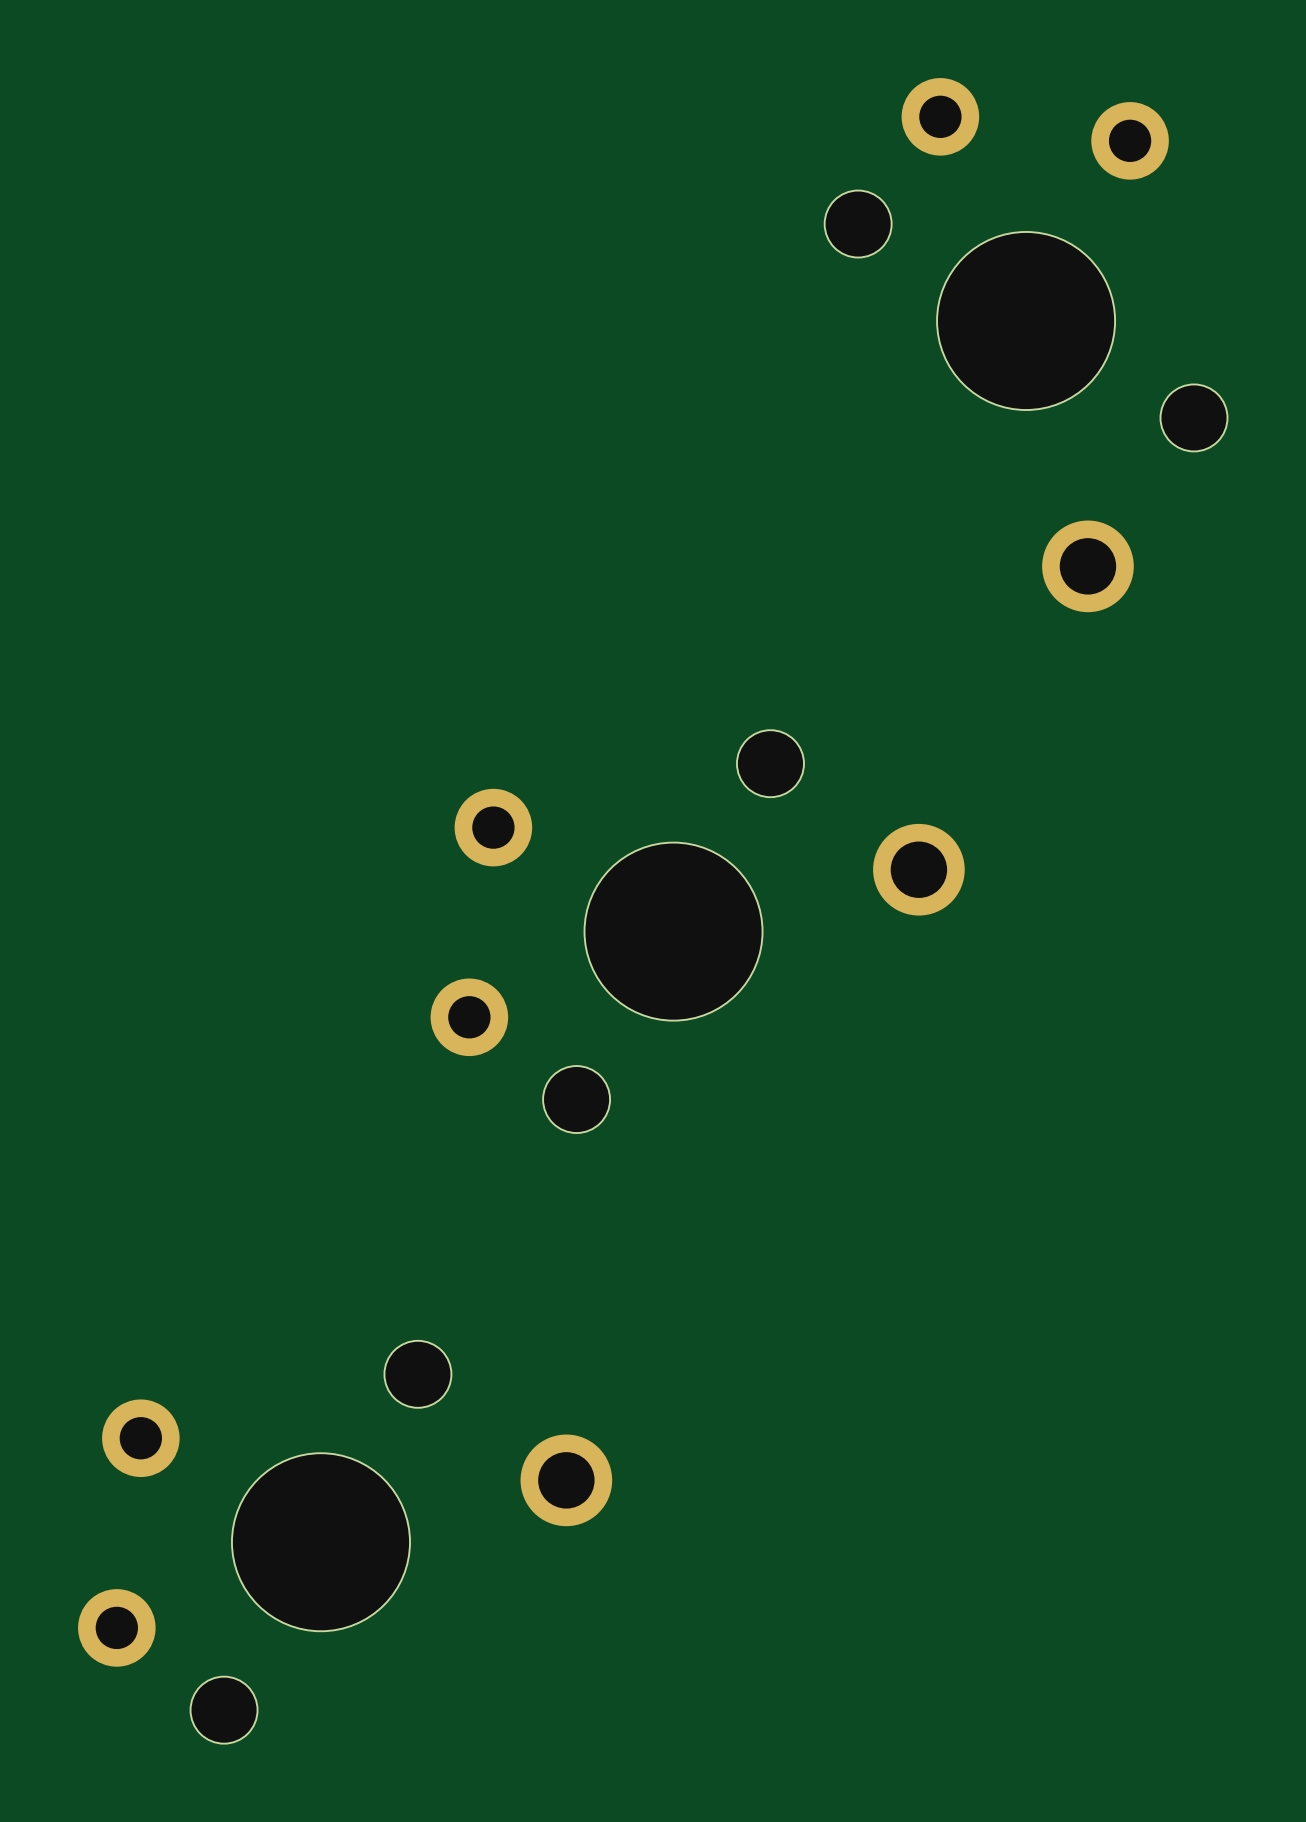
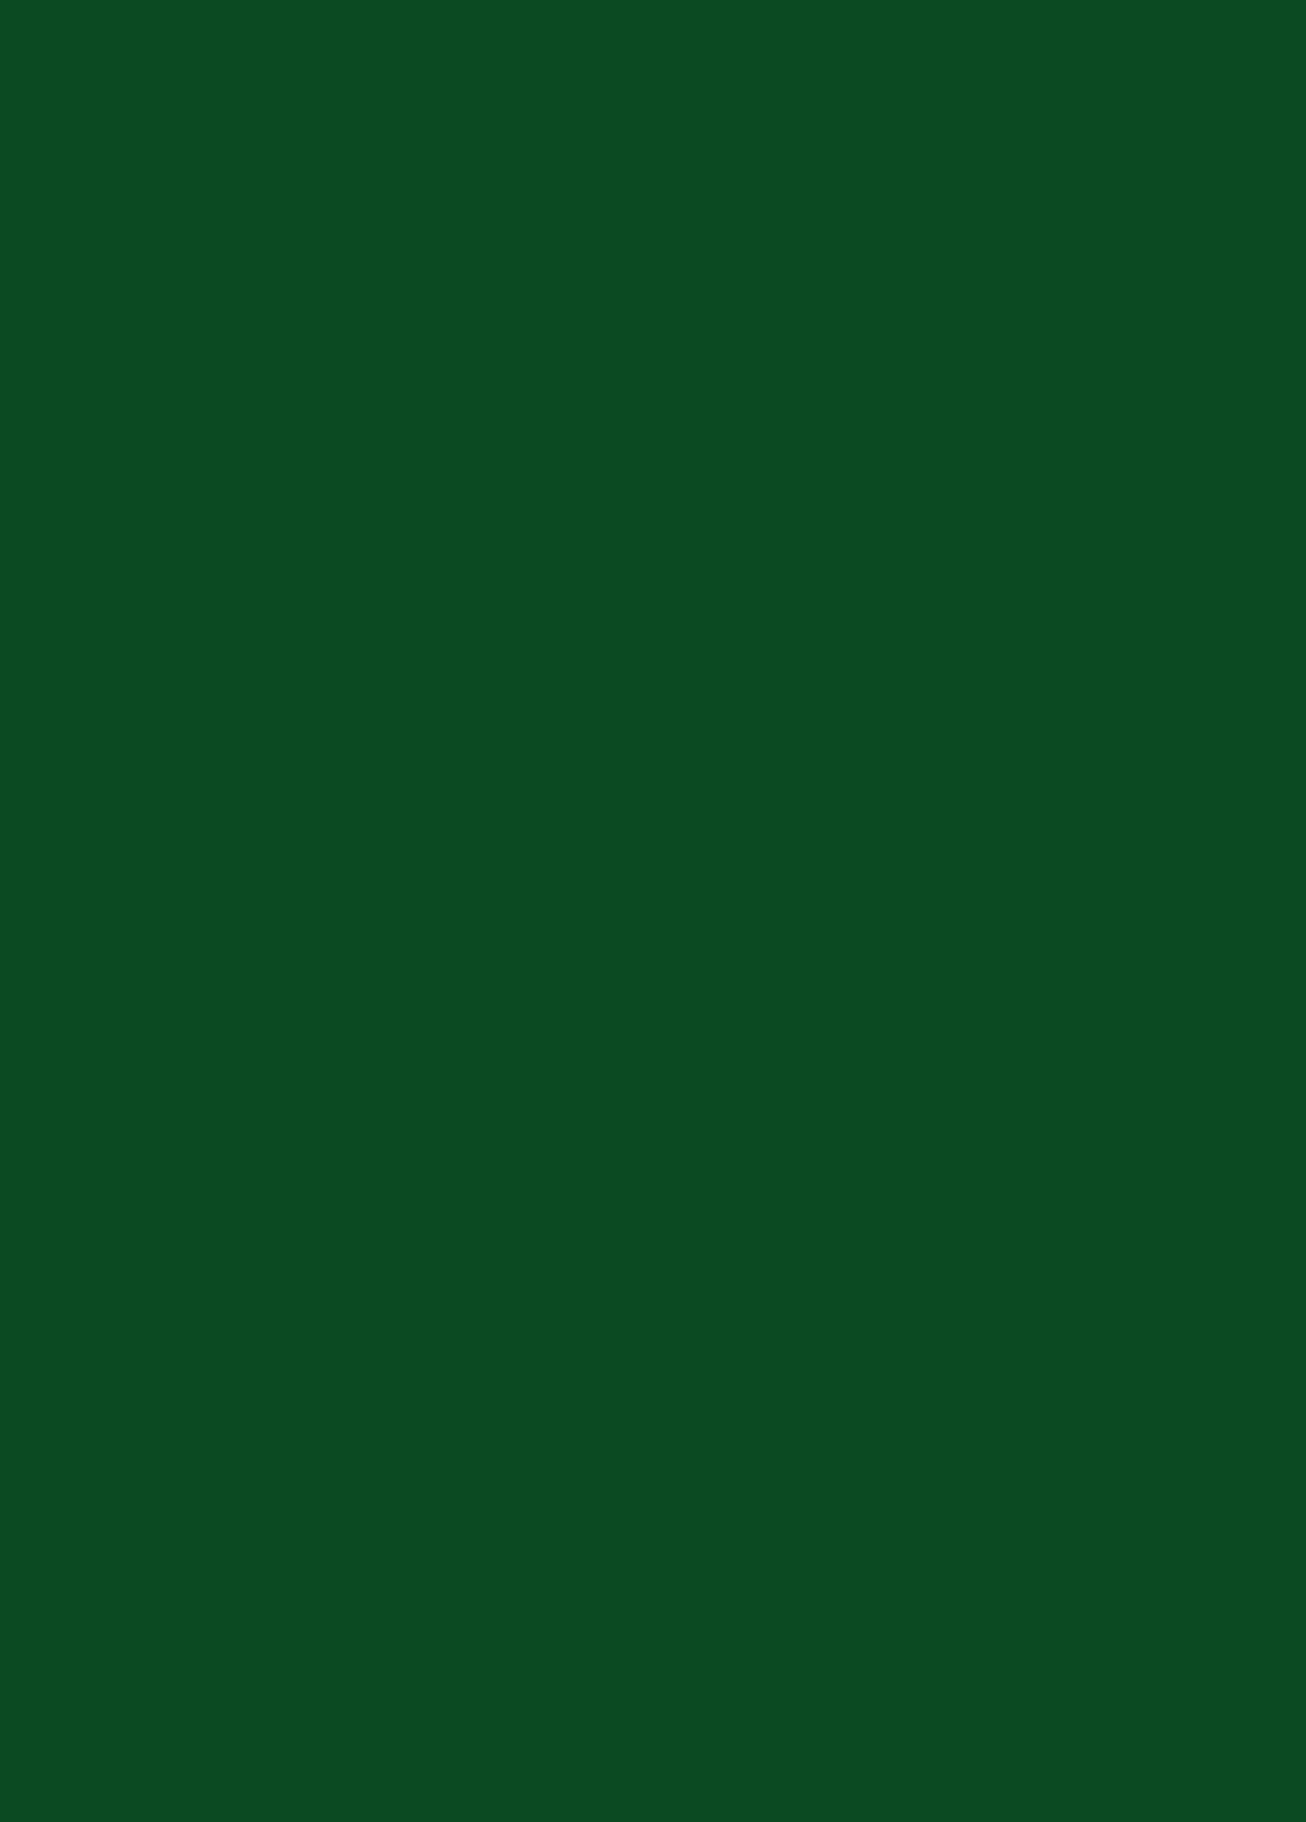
part: (1026, 345) -> none
part: (697, 931) -> none
part: (345, 1542) -> none

